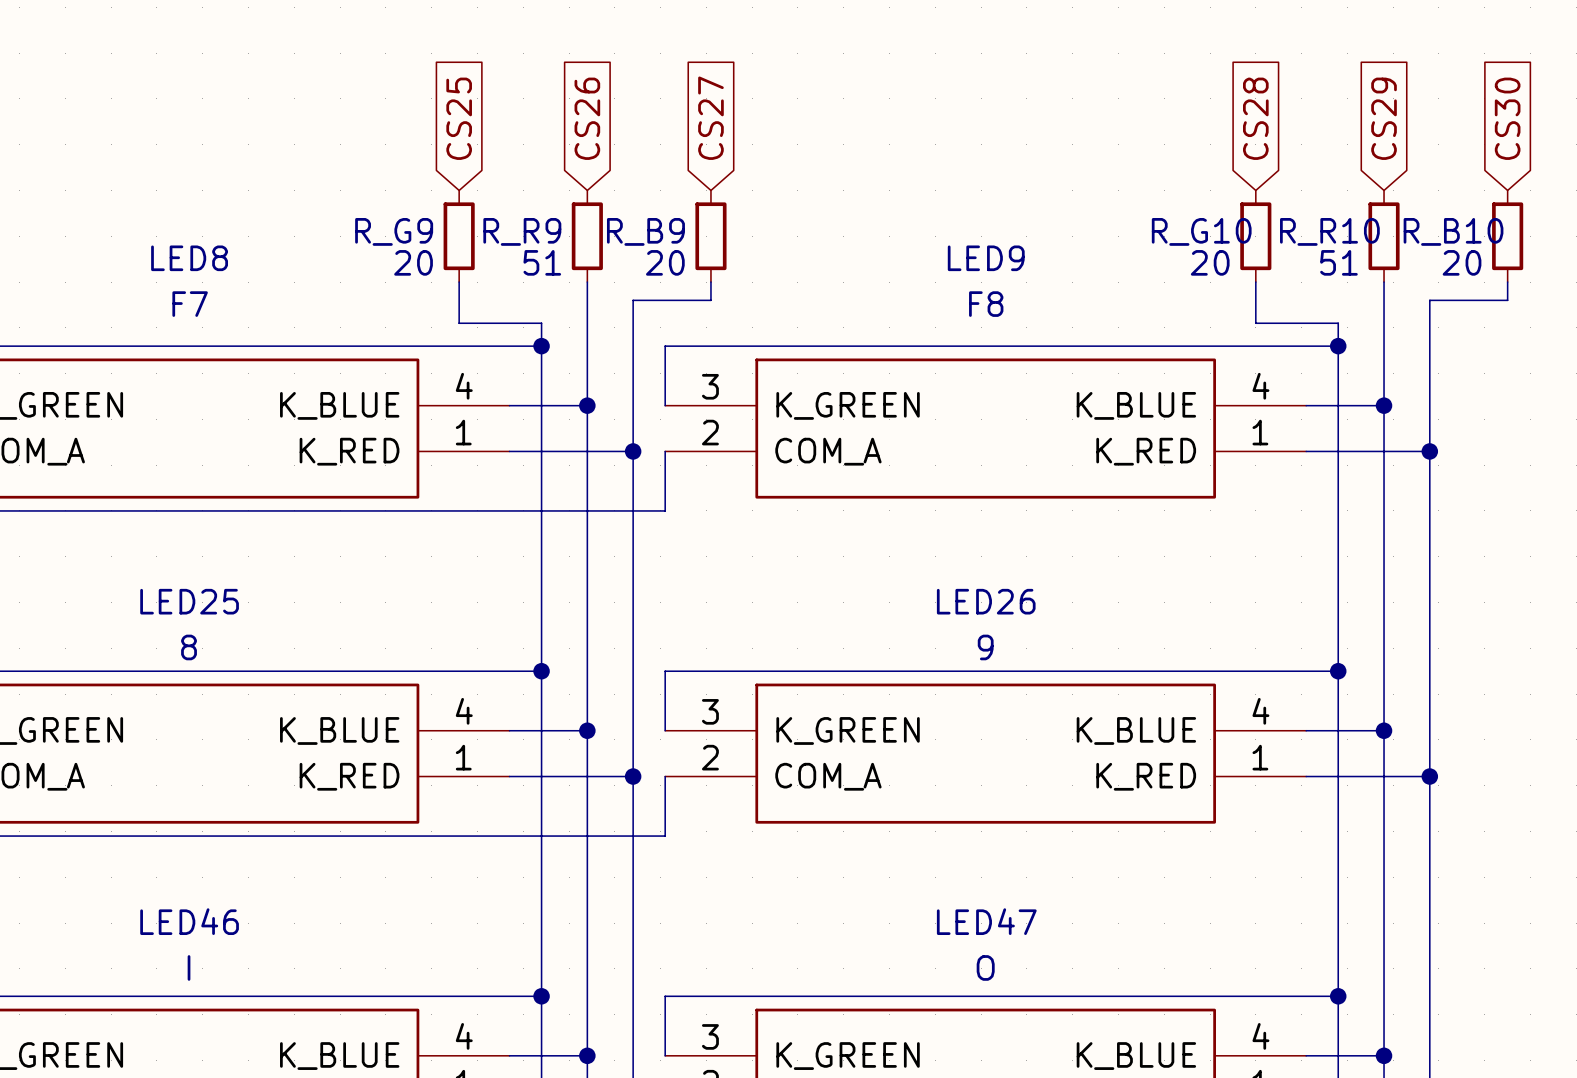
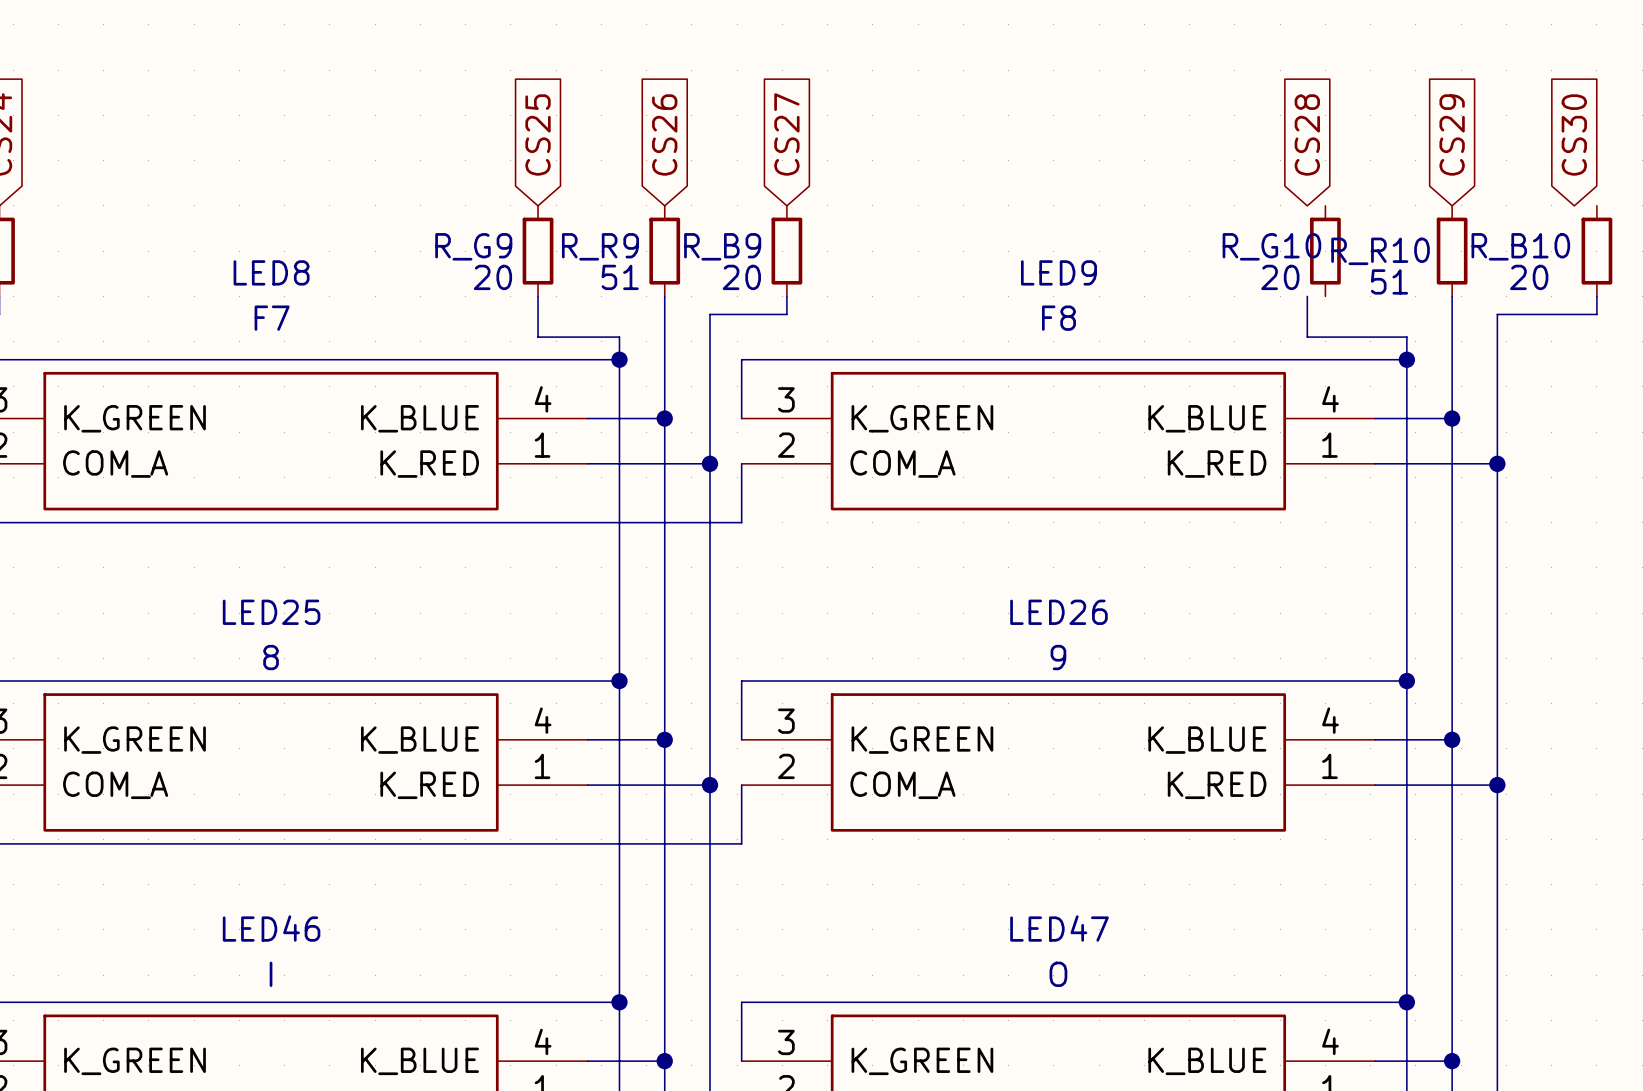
global label position: CS28 (1255, 118) -> CS28 (1307, 134)
R_R10 name position: R_R10 (1329, 231) -> R_R10 (1380, 251)
R_B10 position: (1507, 236) -> (1596, 251)
R_R10 value position: 51 (1338, 262) -> 51 (1389, 281)
wire: (1255, 282) (1255, 323) -> (1307, 296) (1307, 337) (1325, 337)
wire: (1507, 282) (1507, 300) -> (1596, 296) (1596, 314) (1574, 314)

